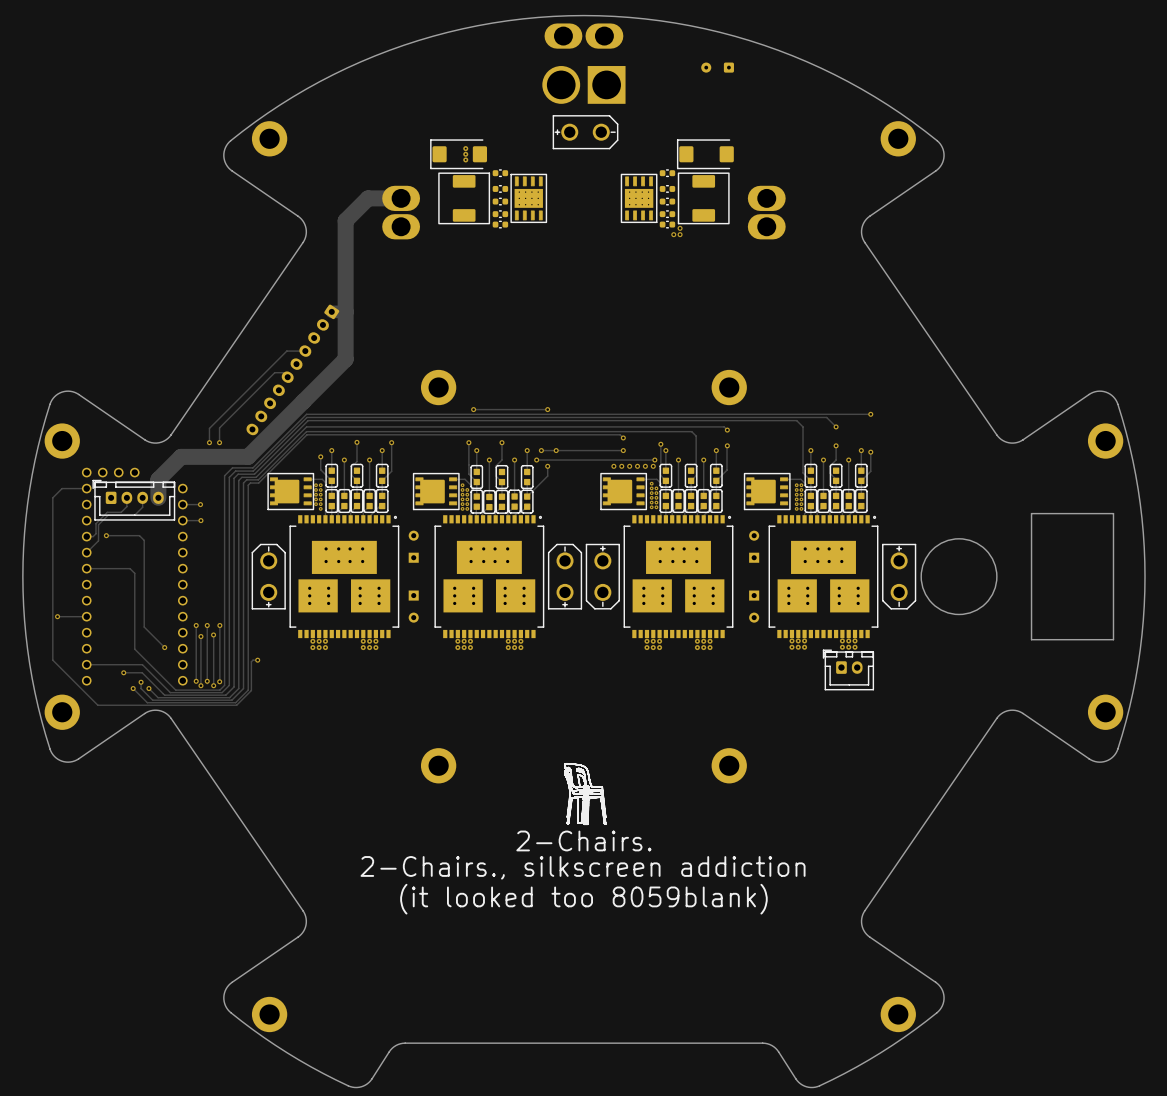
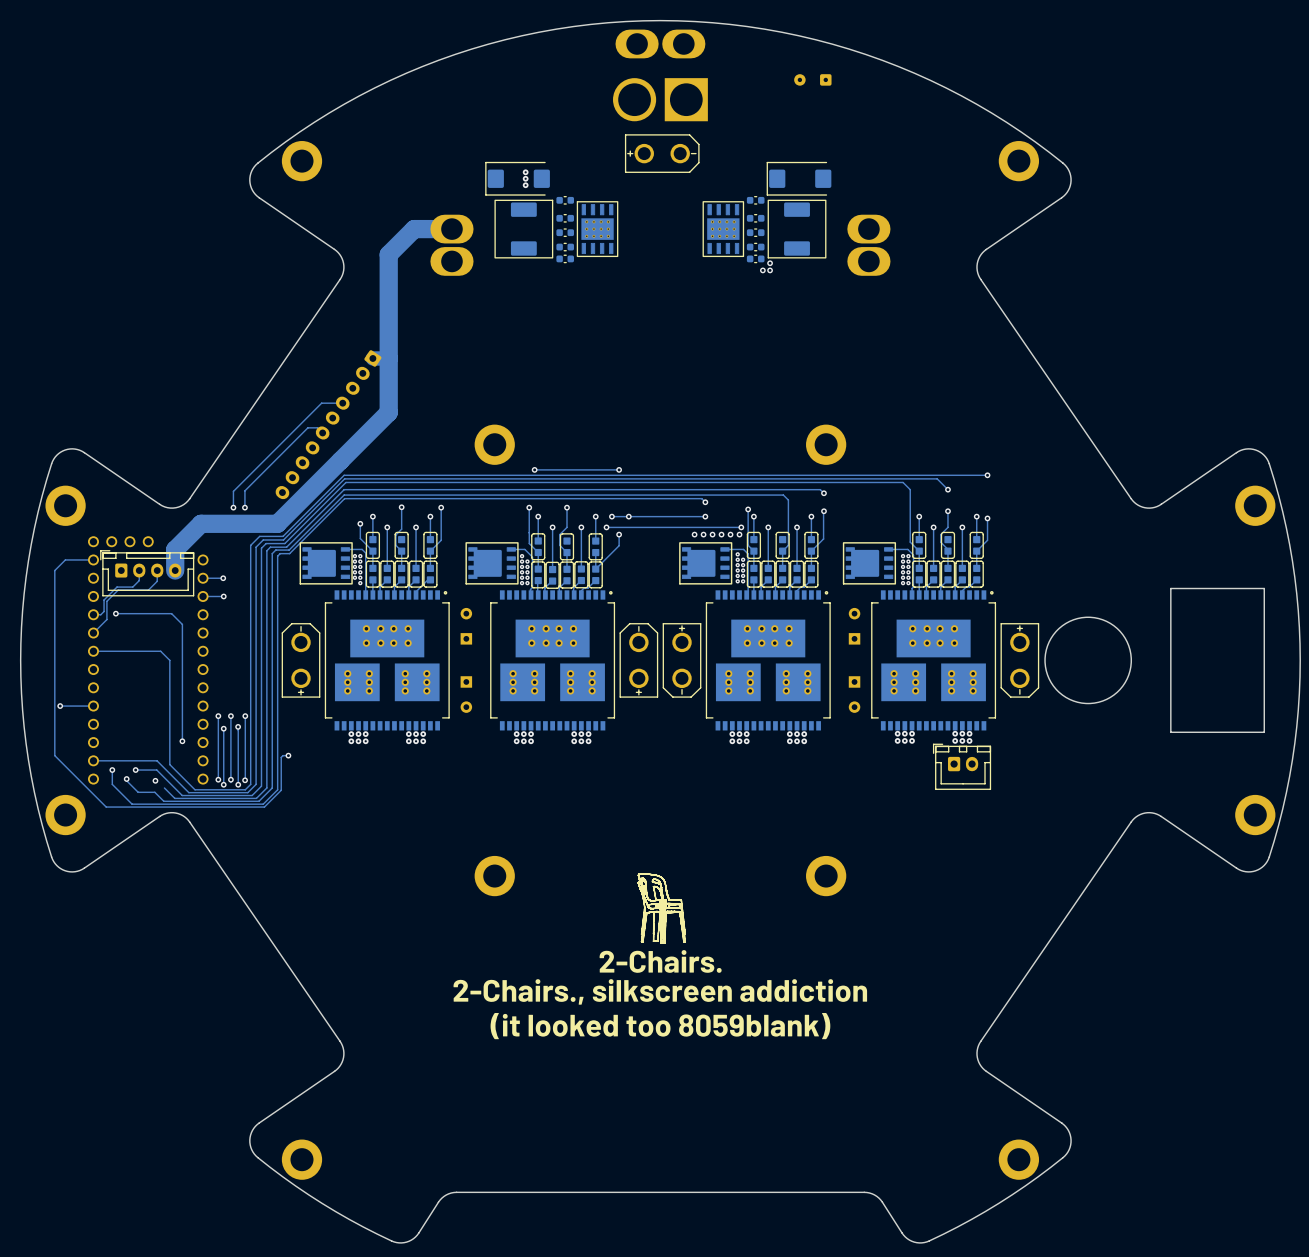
track: (139, 535) (144, 540) (144, 627) (164, 647) -> (153, 613) (171, 613) (182, 624) (182, 741)
track: (130, 568) (134, 573) (134, 649) (153, 668) -> (142, 651) (160, 651) (169, 660) (169, 764)
via: none -> (112, 770)
via: none -> (126, 779)
track: (141, 682) (141, 688) (152, 700) -> (126, 779) (138, 792) (154, 792) (163, 801) (168, 801)
track: (133, 688) (147, 702) -> (112, 770) (112, 784) (132, 804) (162, 804)
via: (133, 688) -> none
via: (148, 688) -> none

